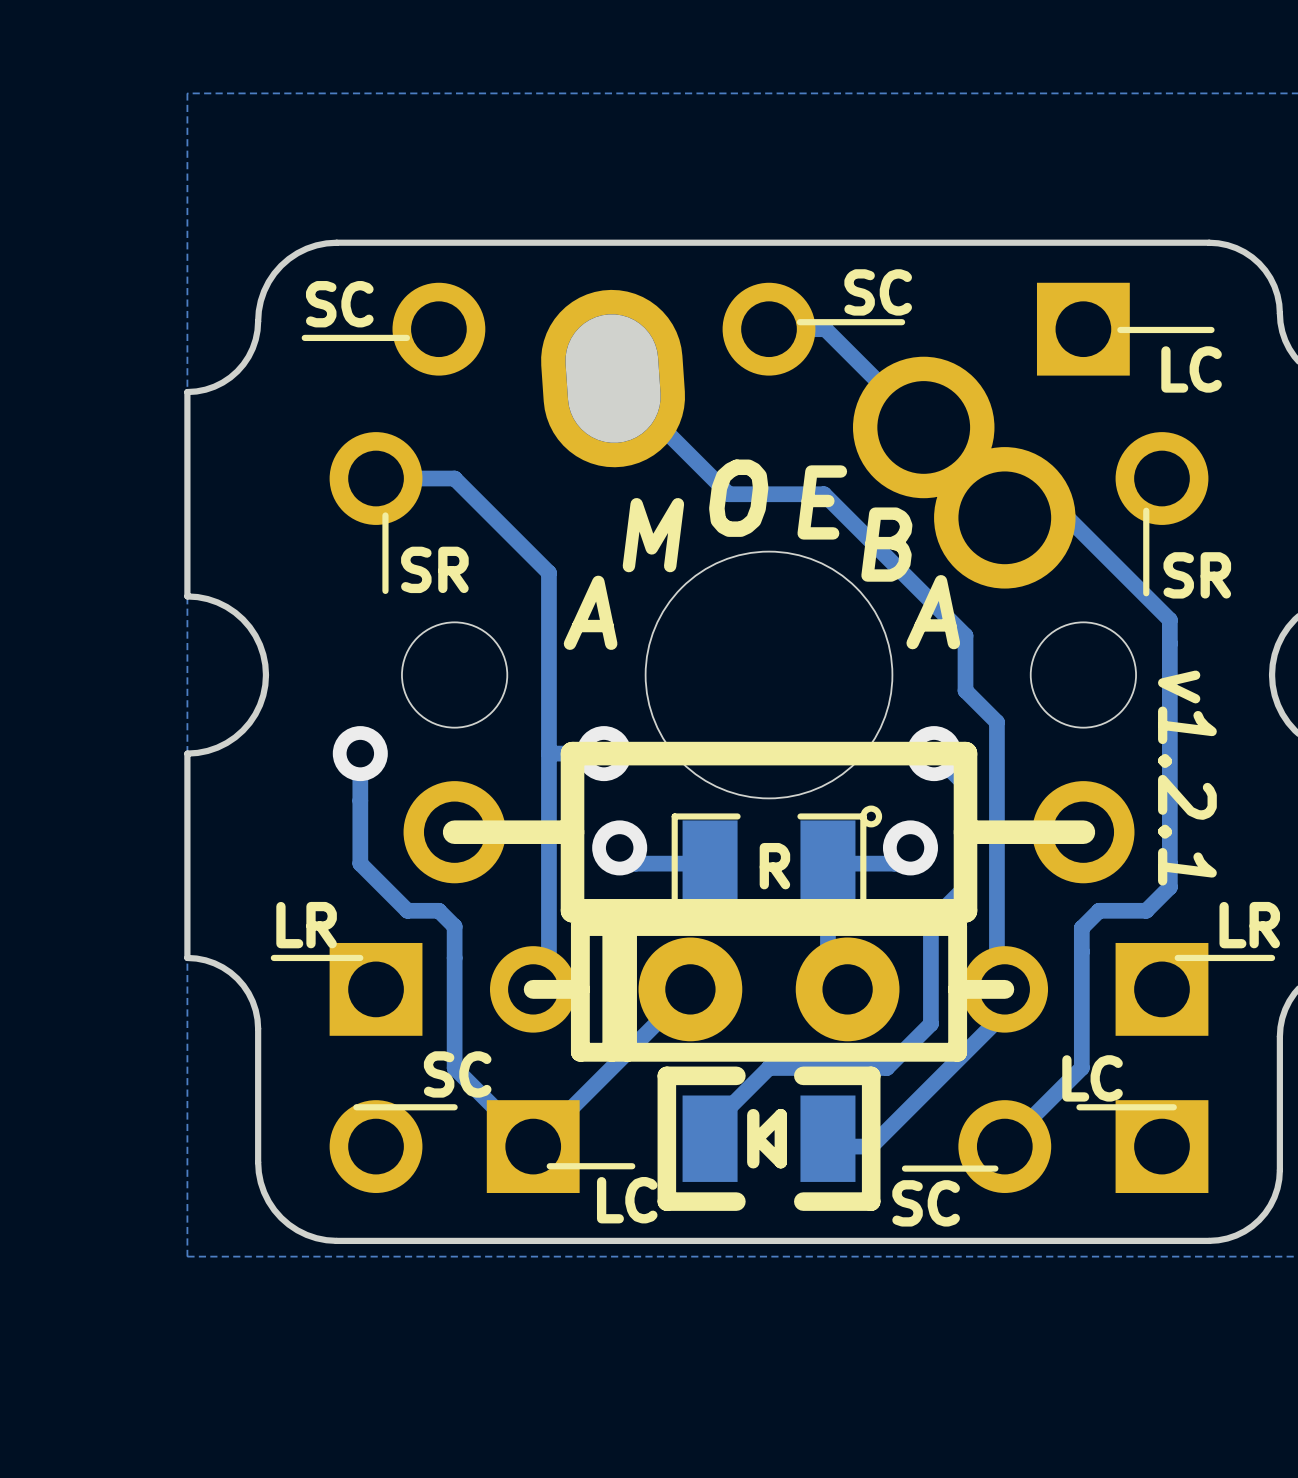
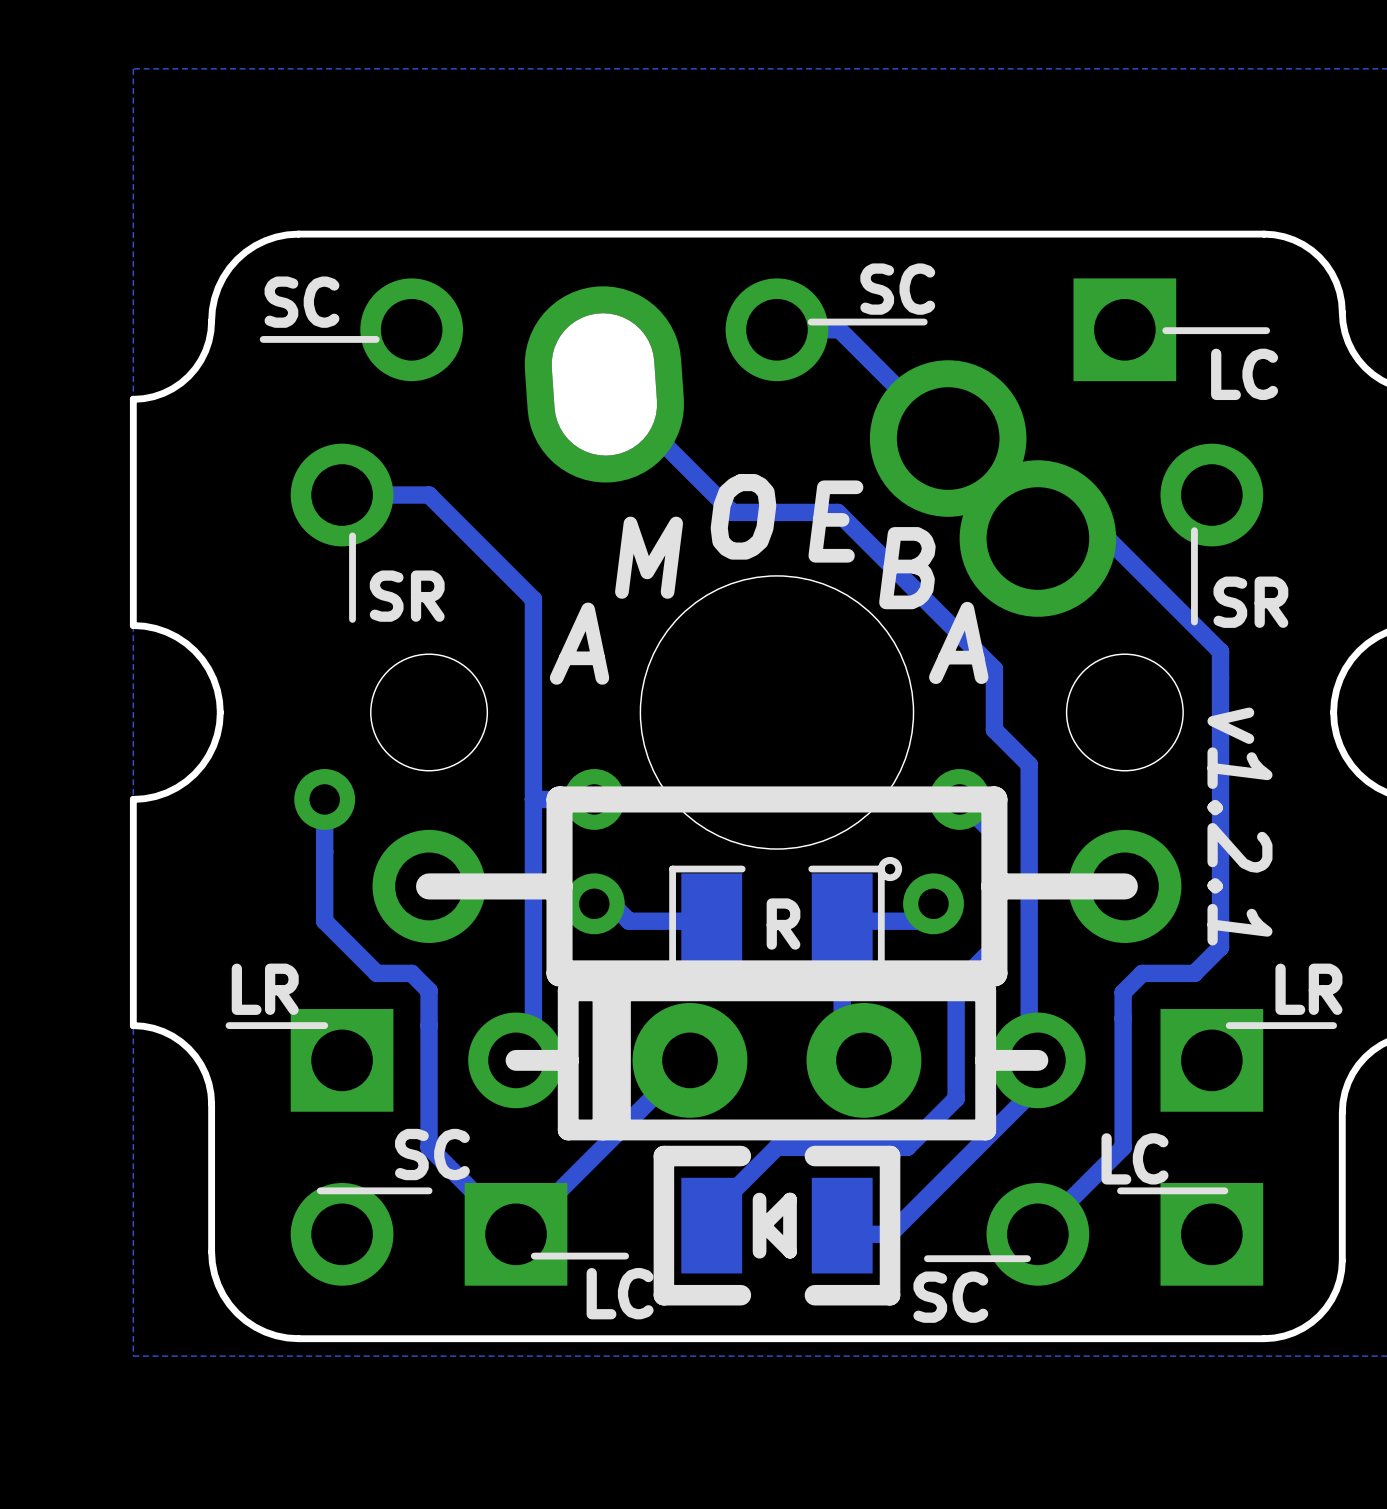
via position: (619, 847) -> (594, 903)

